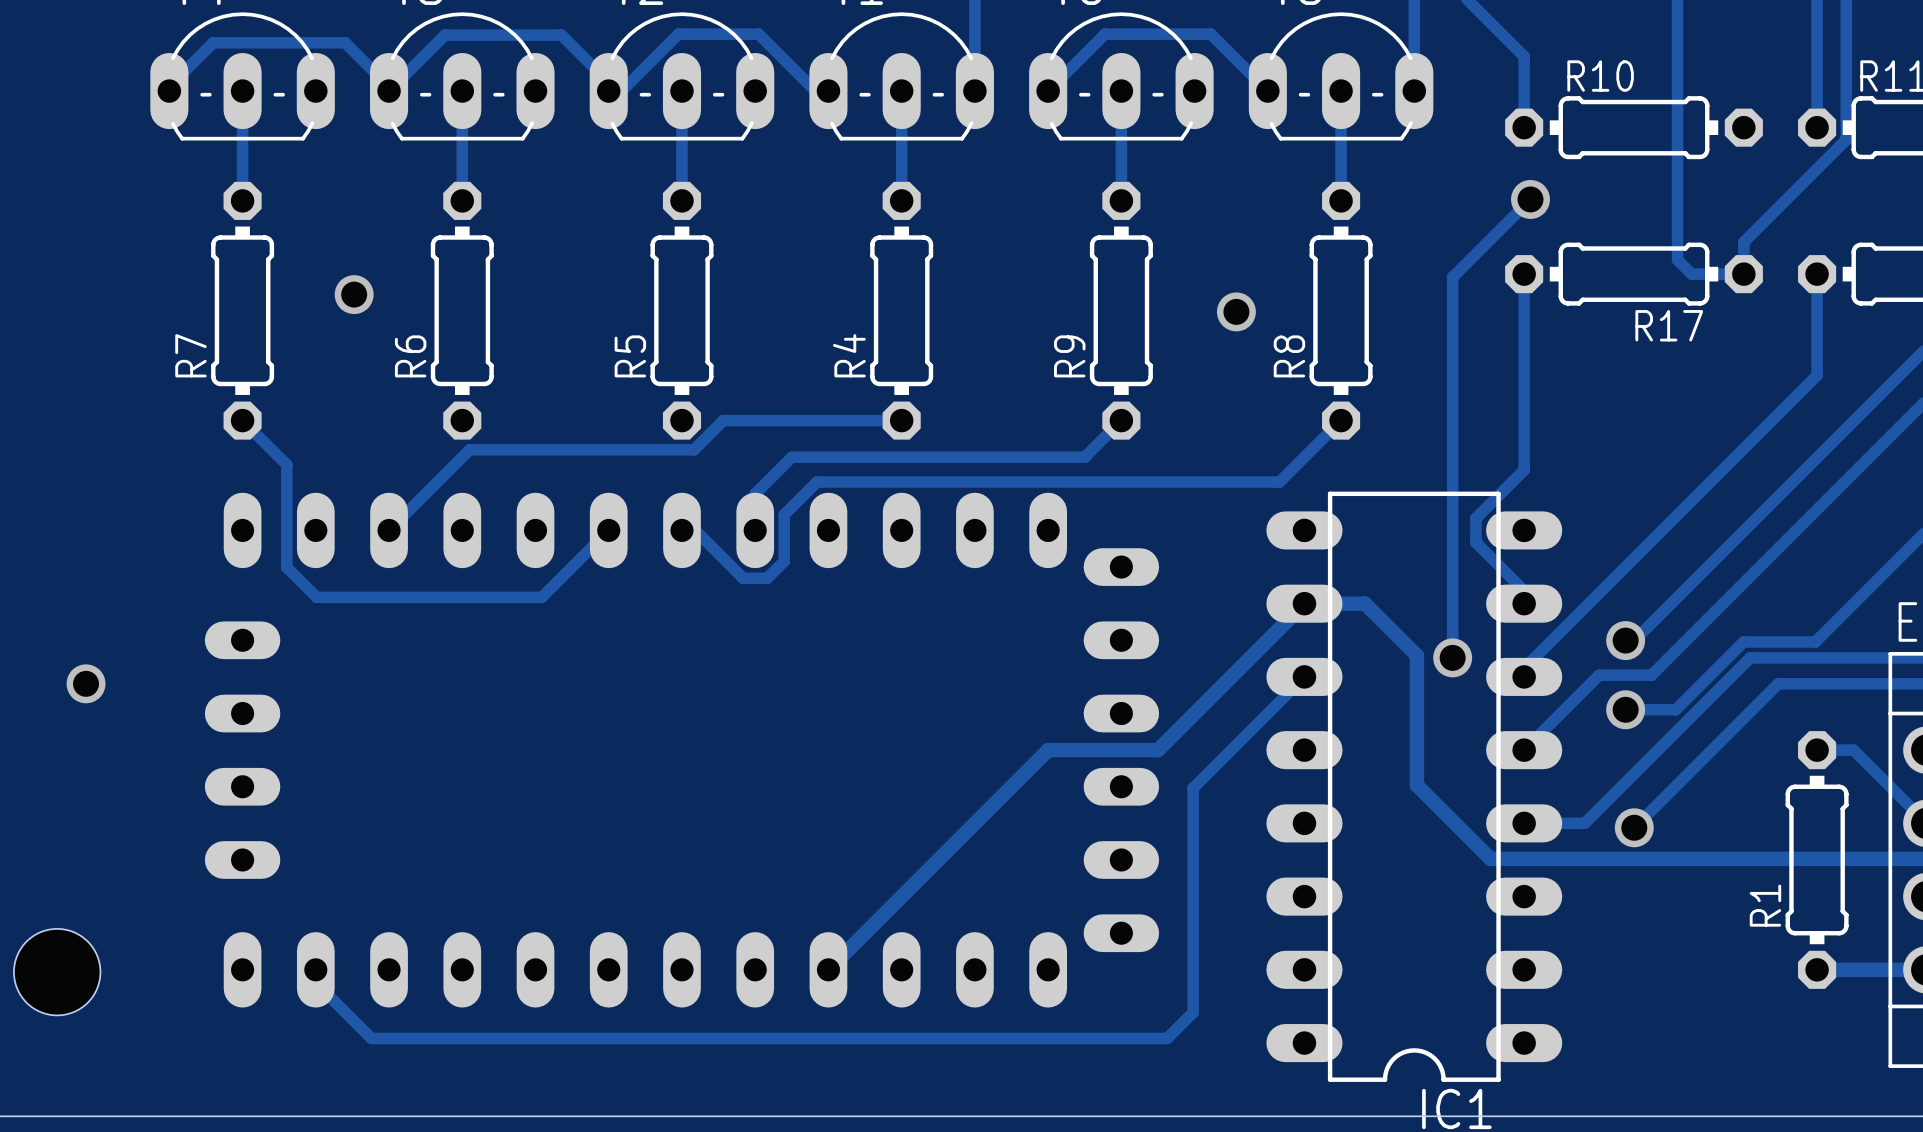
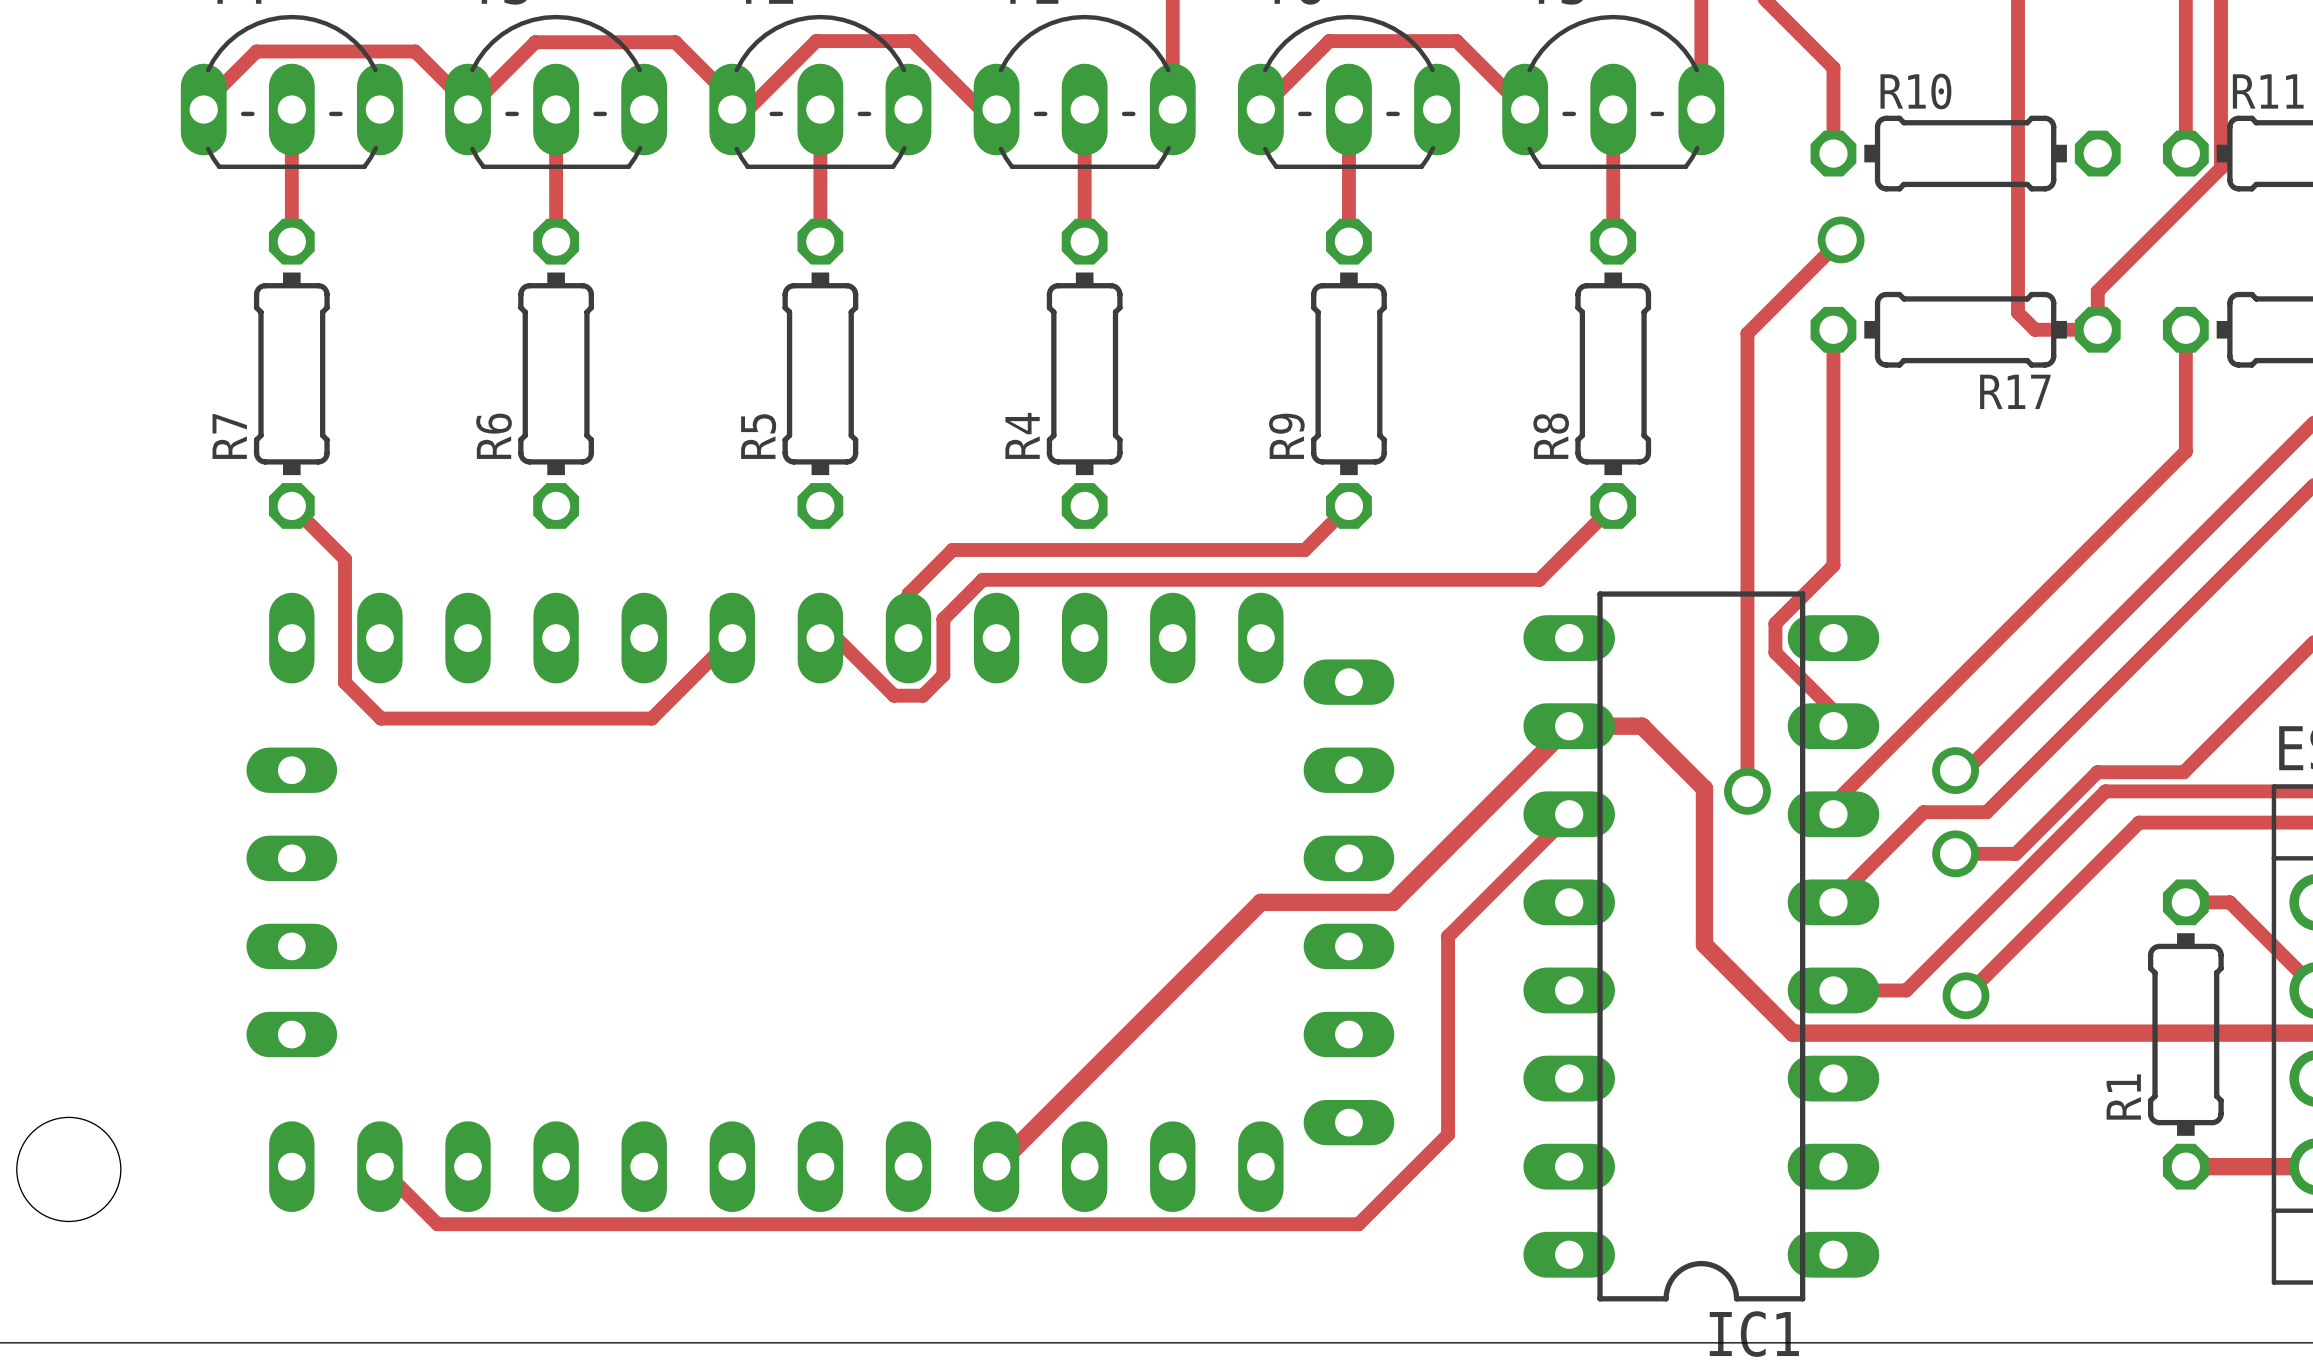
via: (354, 294) -> none
via: (1236, 311) -> none
track: (901, 420) (723, 420) (694, 449) (469, 449) (389, 530) -> none
track: (1304, 676) (1193, 788) (1193, 1012) (1167, 1038) (371, 1038) (315, 982) (315, 969) -> (1569, 814) (1448, 936) (1448, 1134) (1358, 1224) (437, 1224) (379, 1166)
via: (86, 683) -> none

